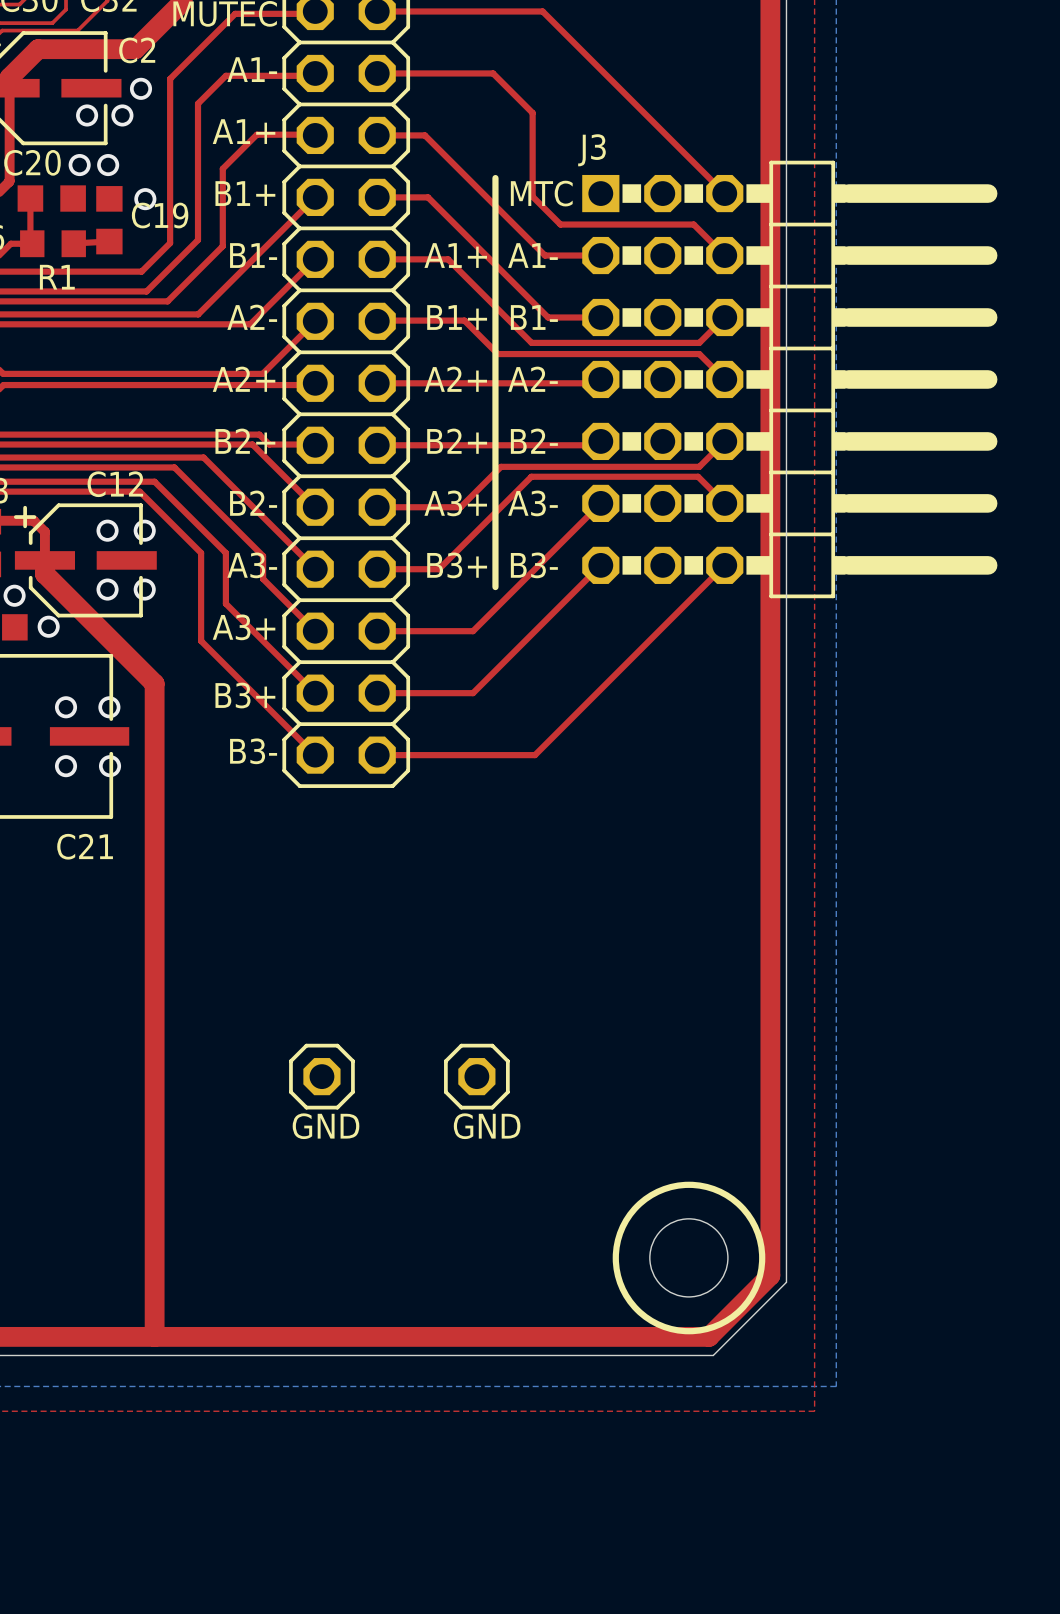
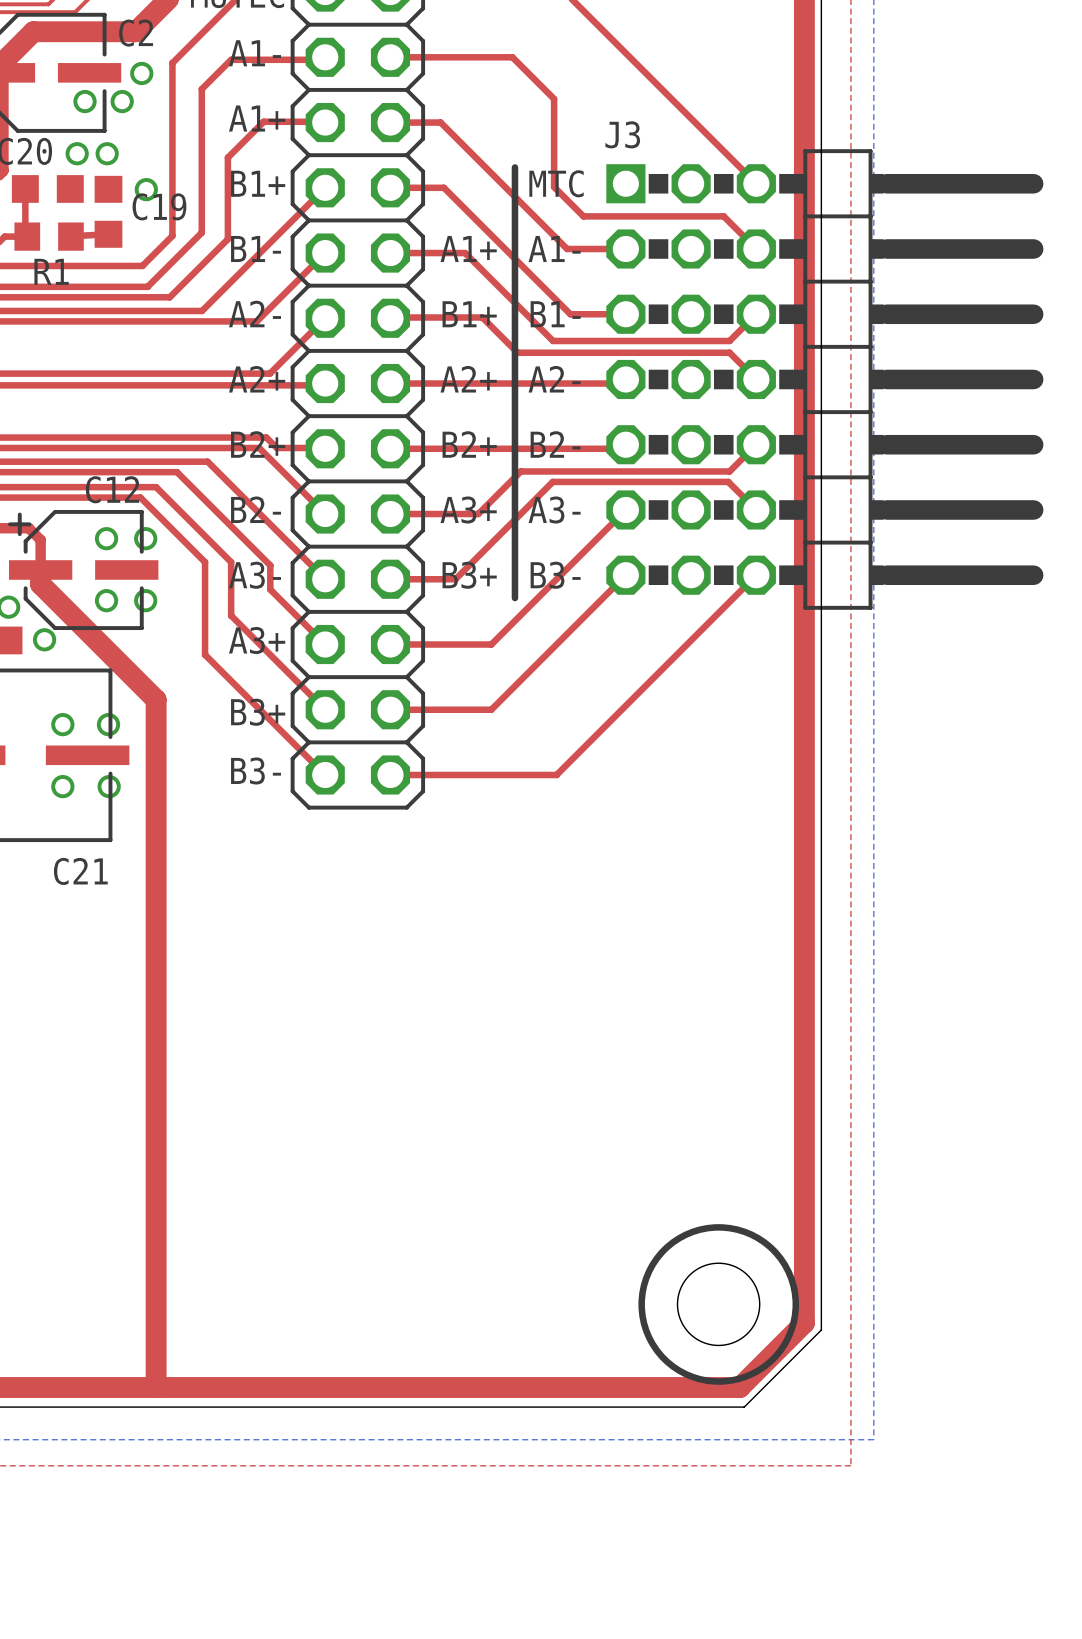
part: (321, 1076) -> none
part: (476, 1076) -> none
text: GND (326, 1126) -> none
text: GND (487, 1126) -> none

